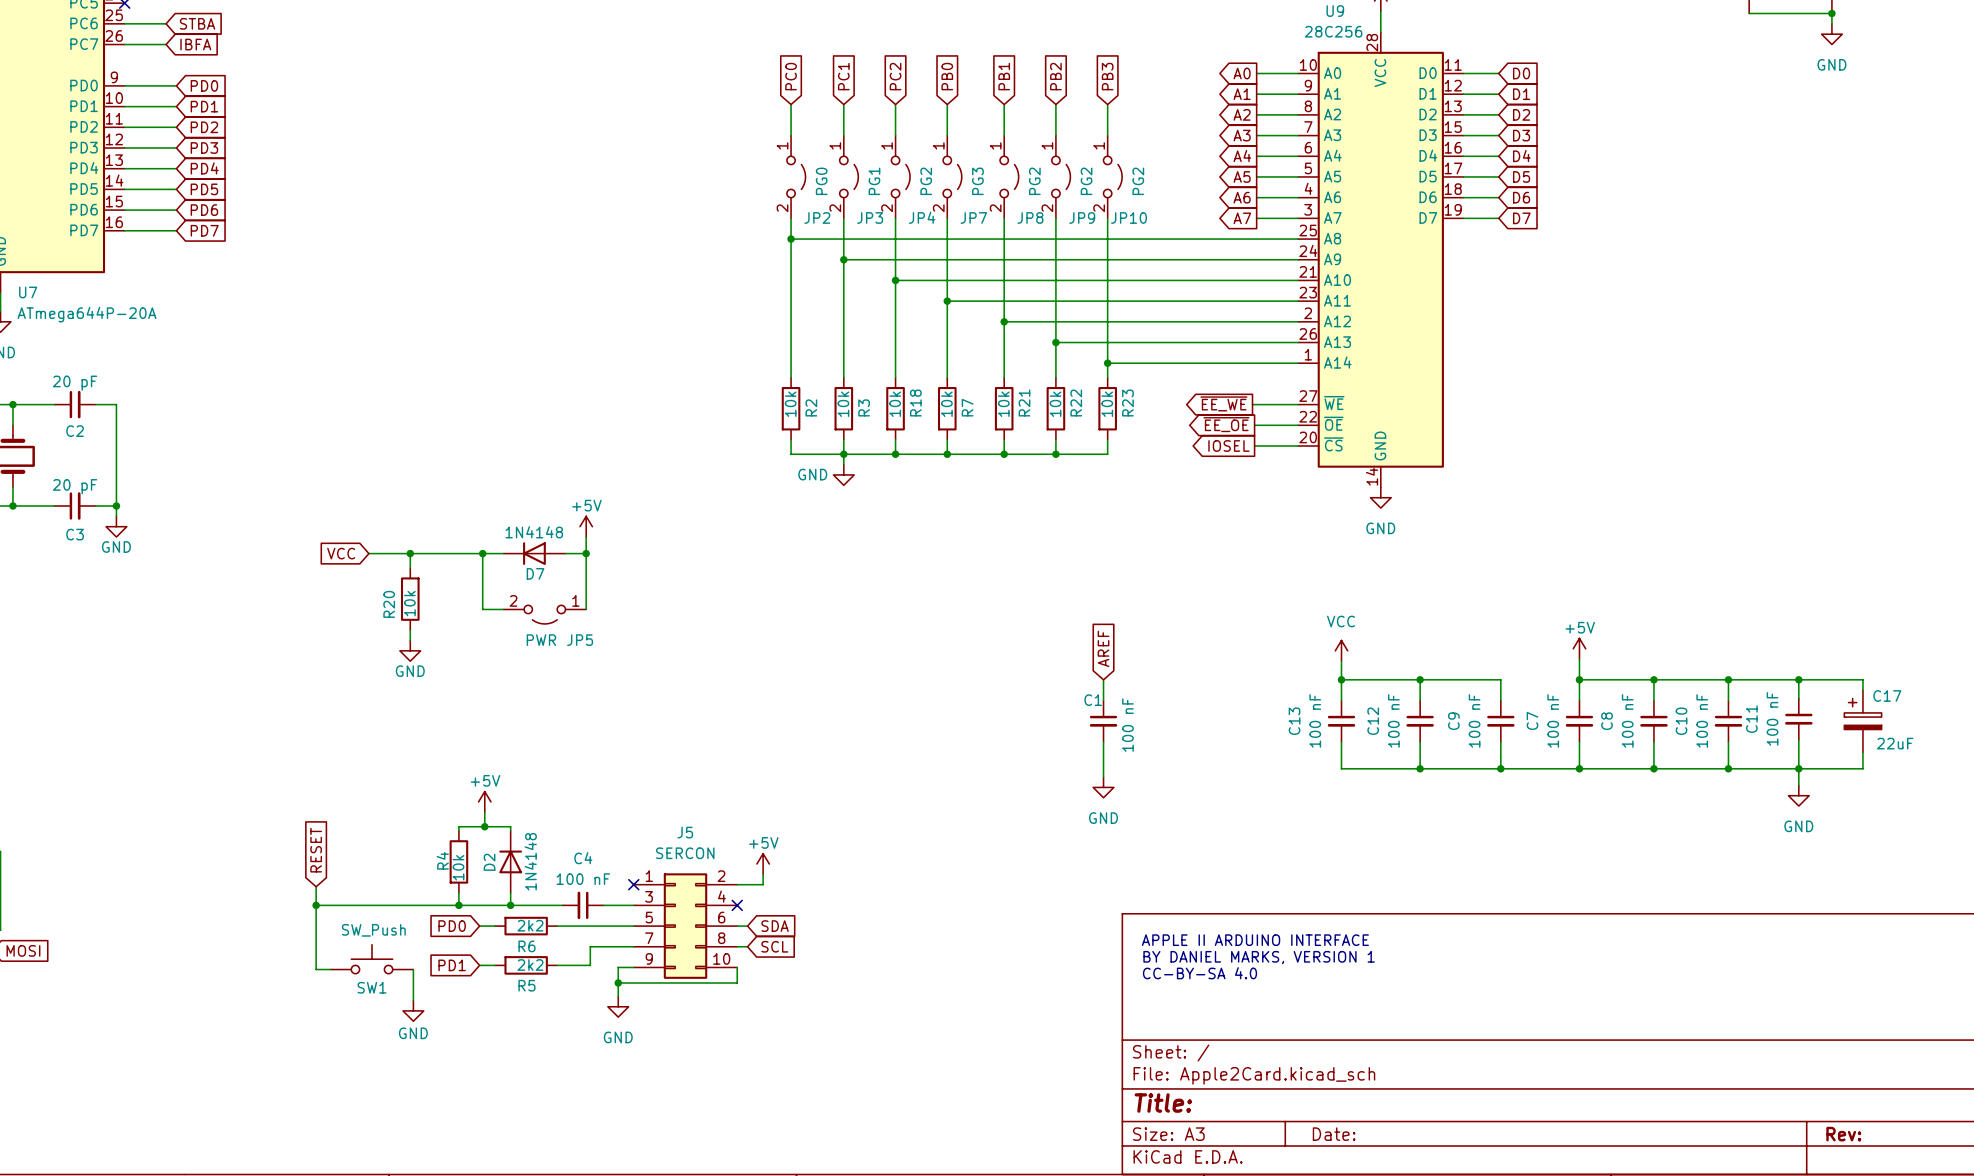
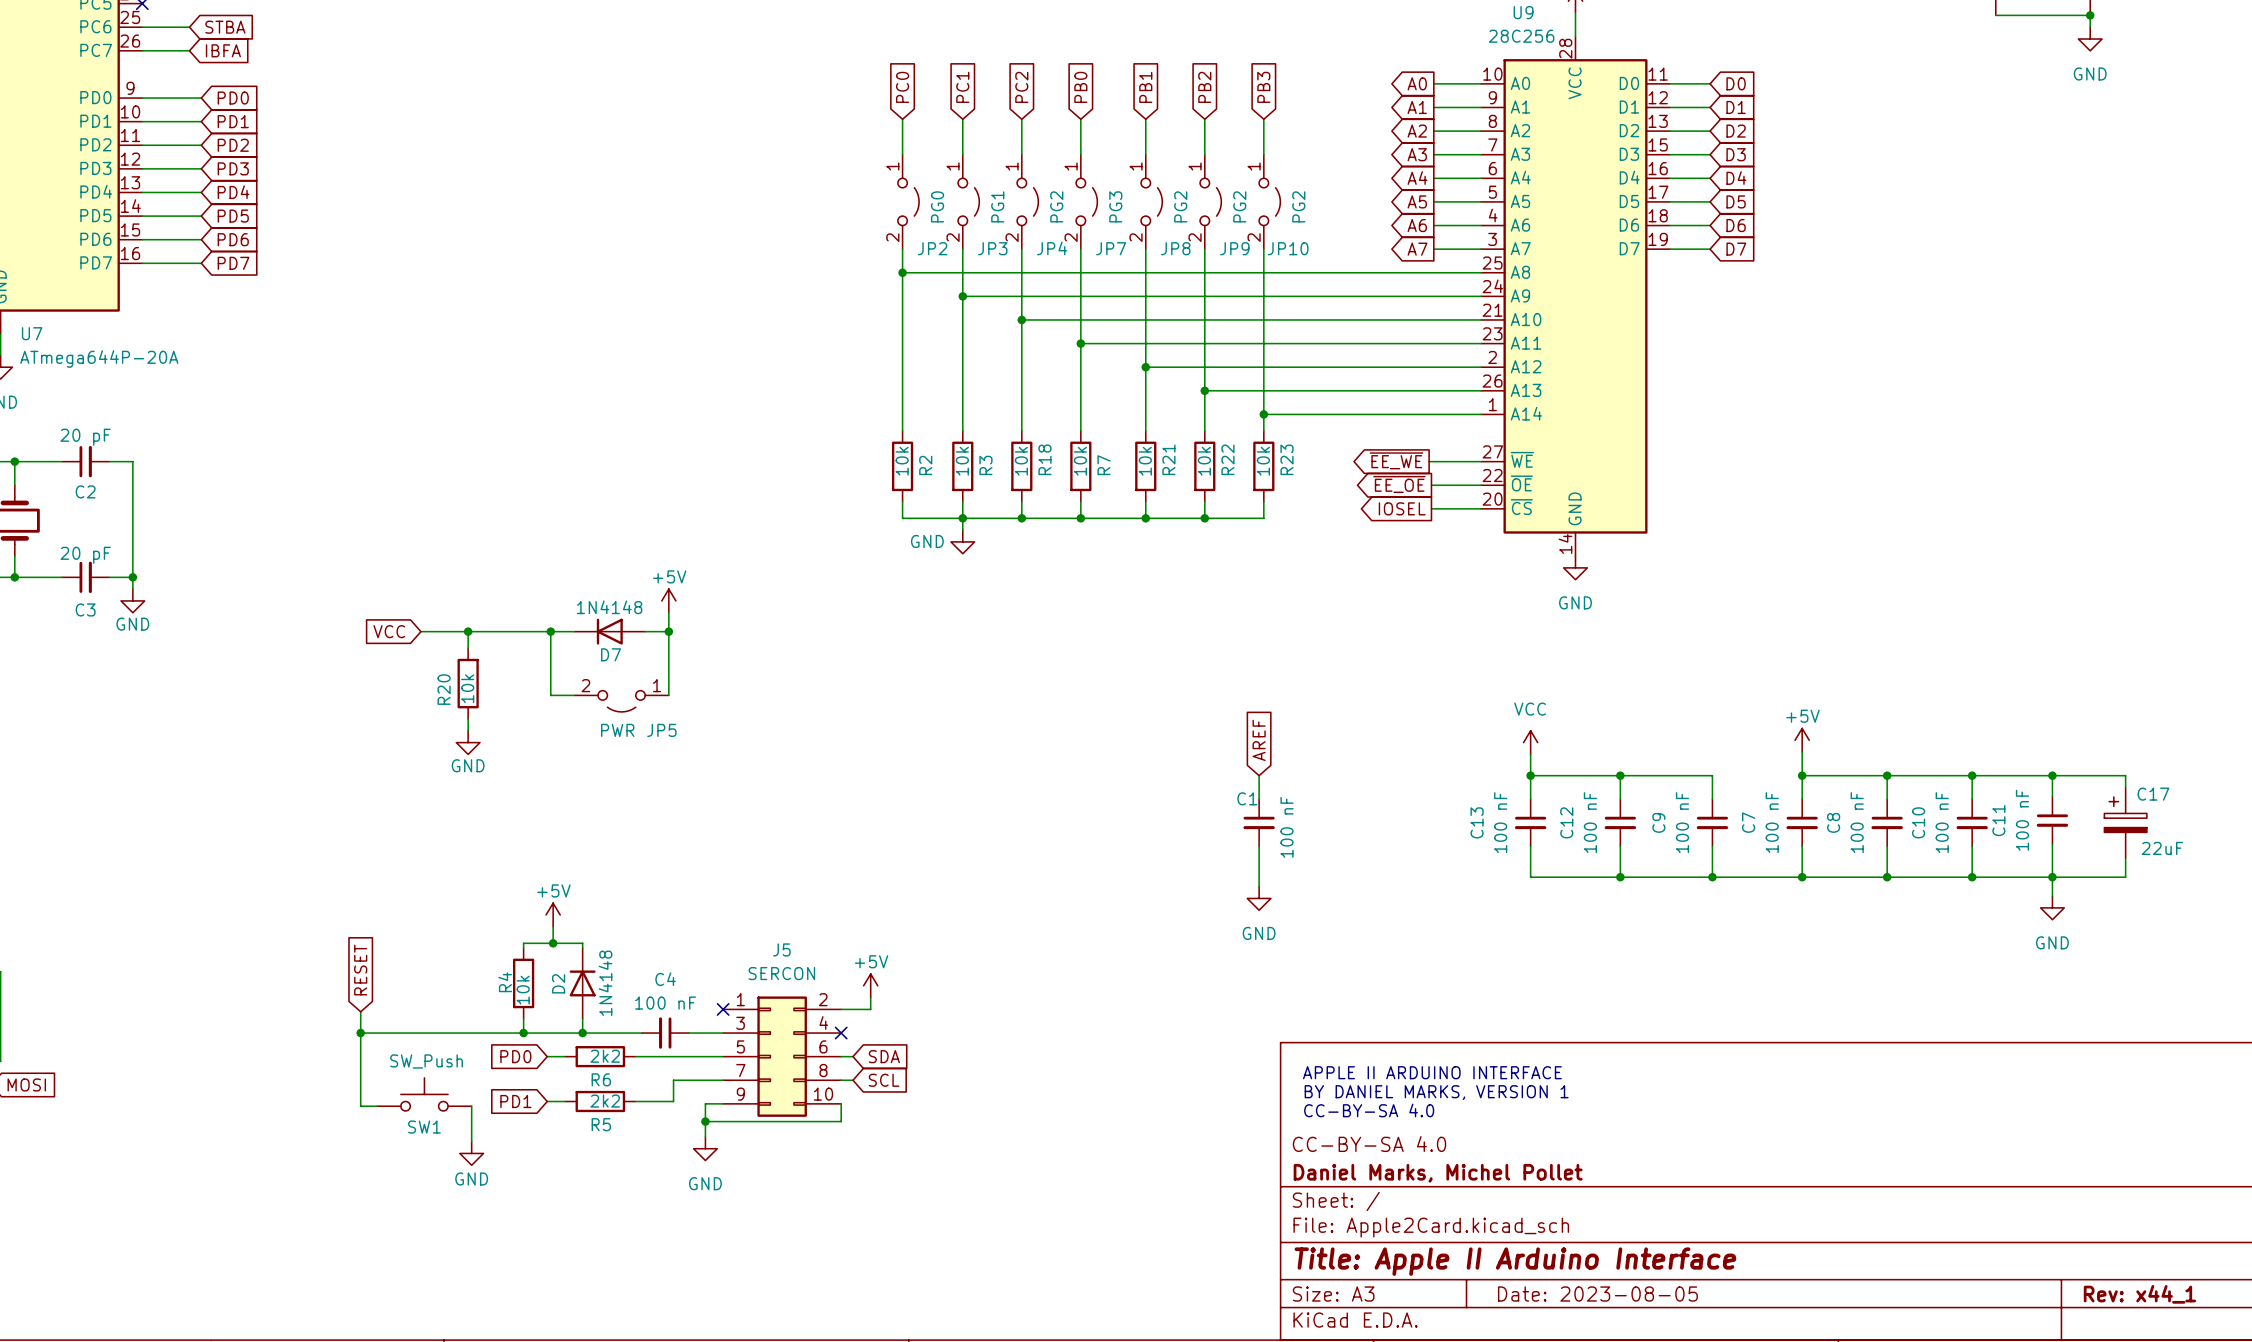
title block: none -> CC-BY-SA 4.0 (1369, 1144)
title block: none -> Daniel Marks, Michel Pollet (1438, 1173)
title block: Title: (1163, 1103) -> Title: Apple II Arduino Interface (1515, 1261)
title block: Date: (1334, 1134) -> Date: 2023-08-05 (1597, 1294)
title block: Rev: (1843, 1134) -> Rev: x44_1 (2139, 1294)

